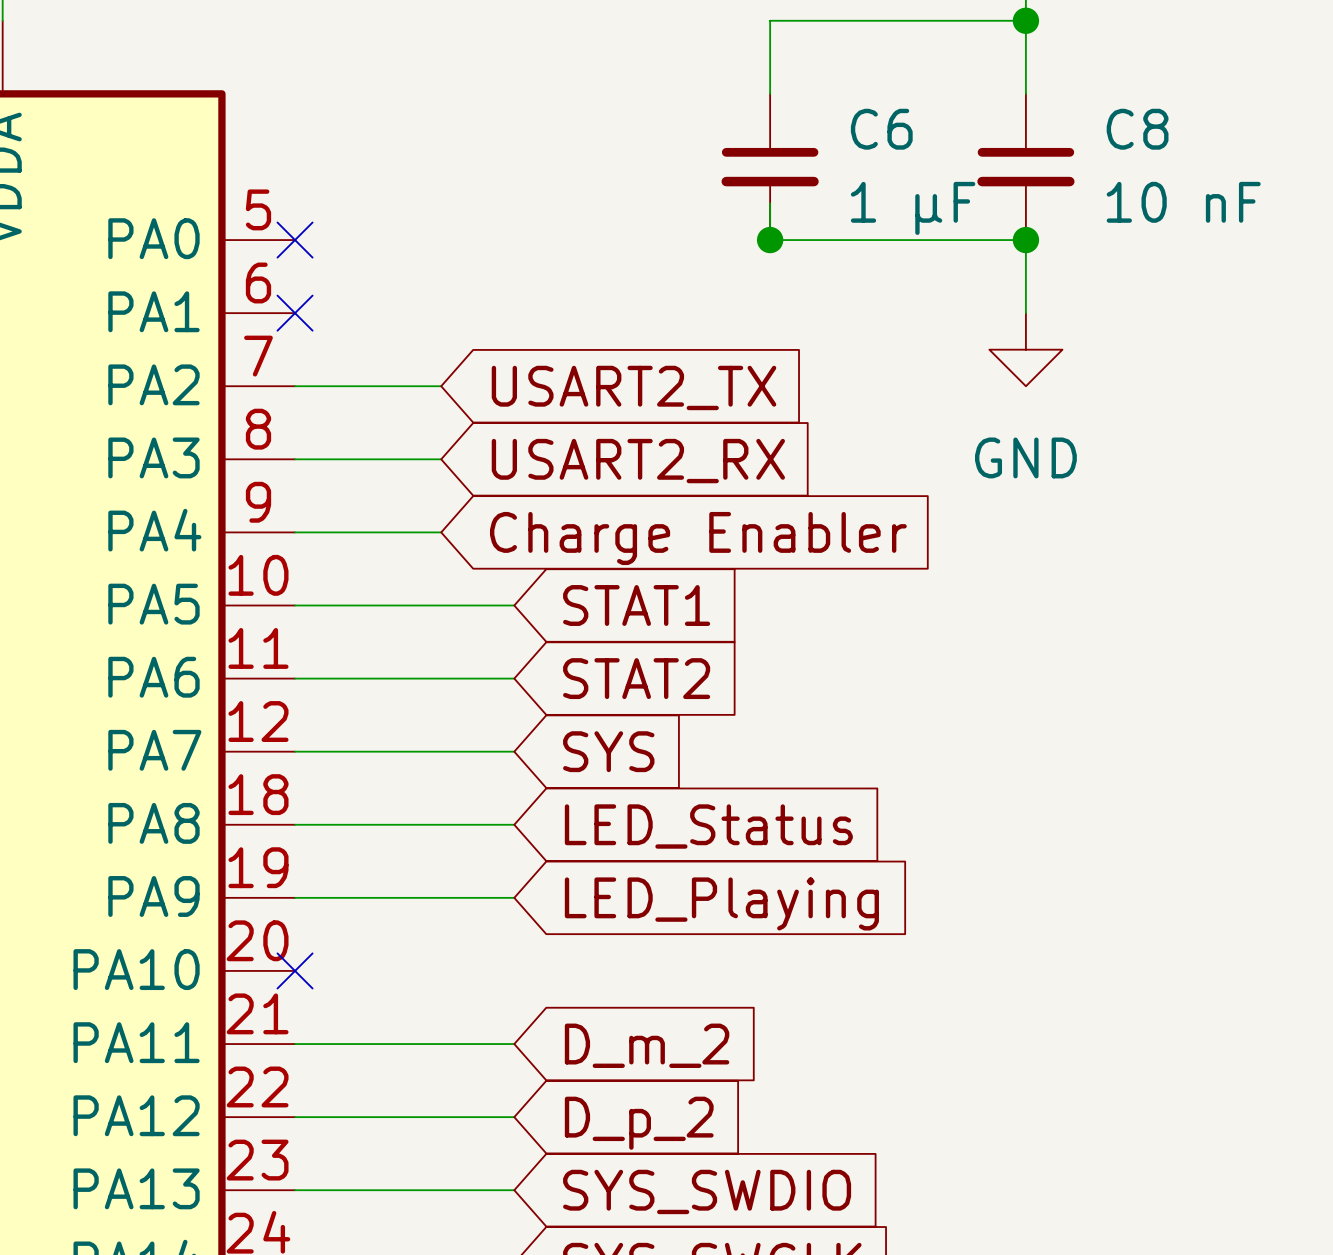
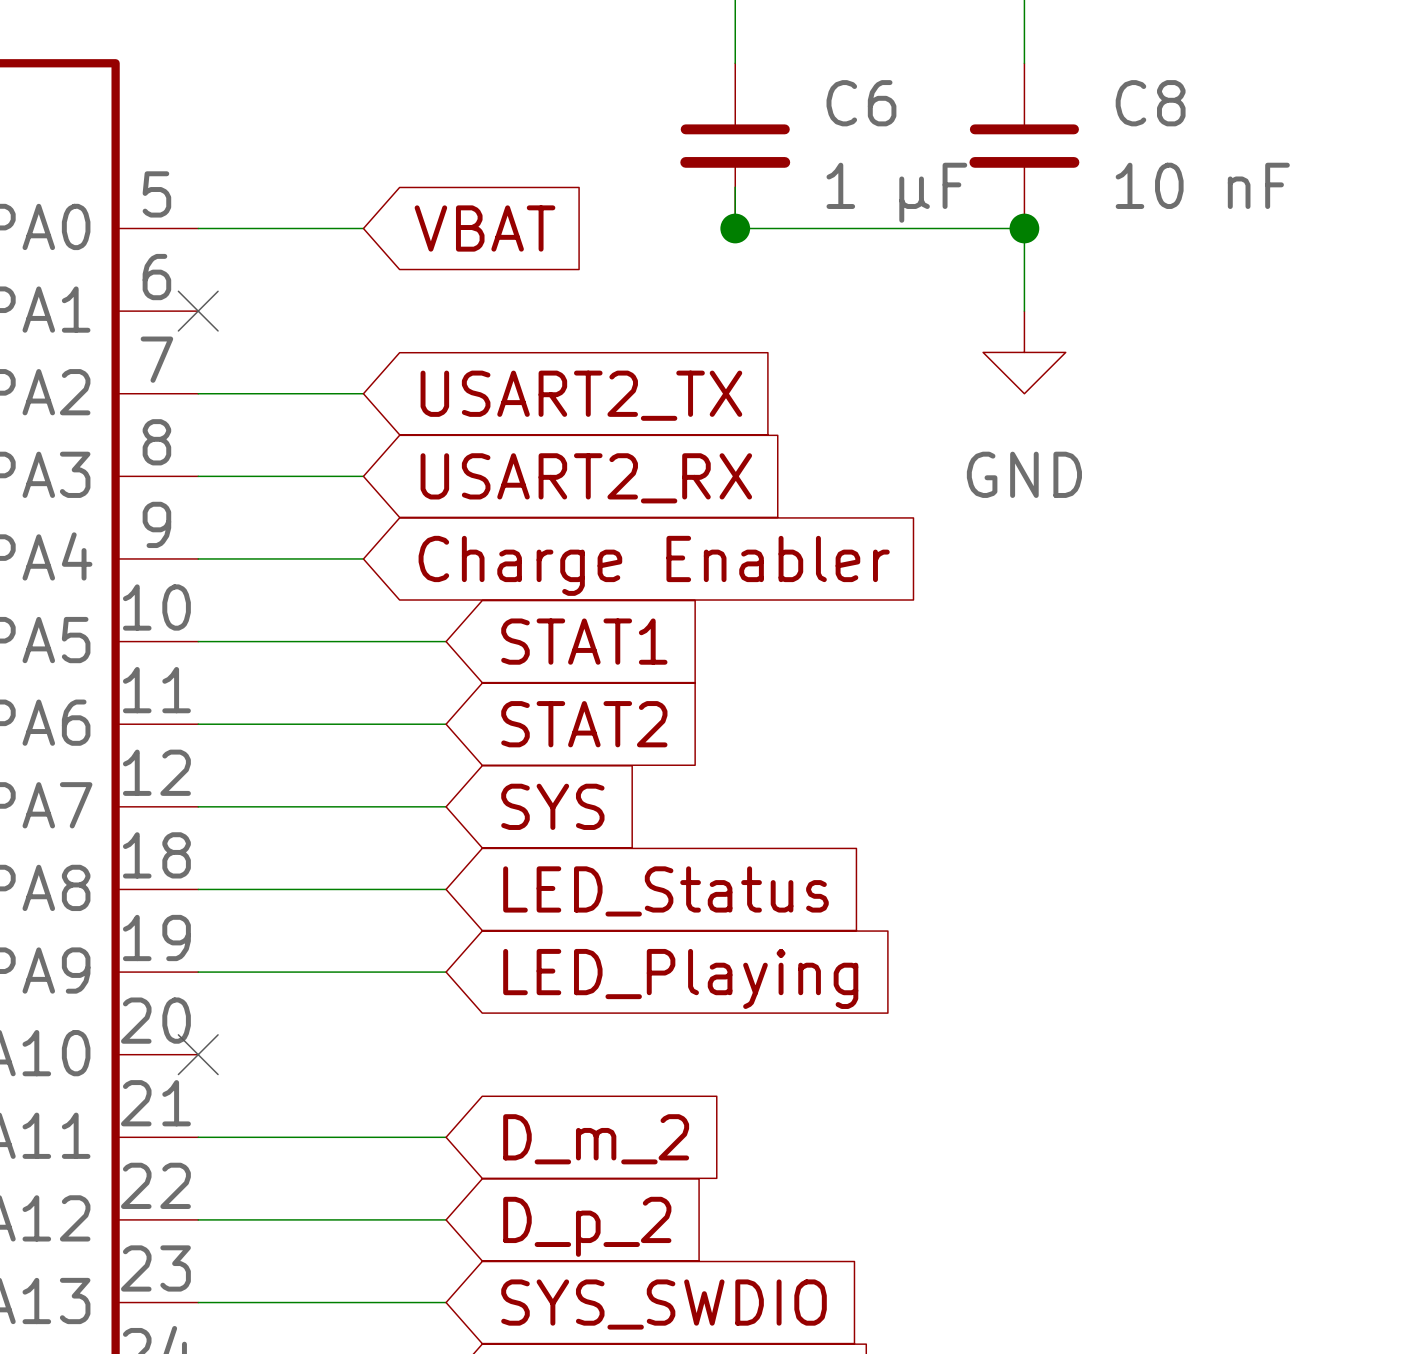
wire: none -> (198, 228) (363, 228)
no-connect mark: (295, 240) -> none
global label: none -> VBAT (485, 228)

